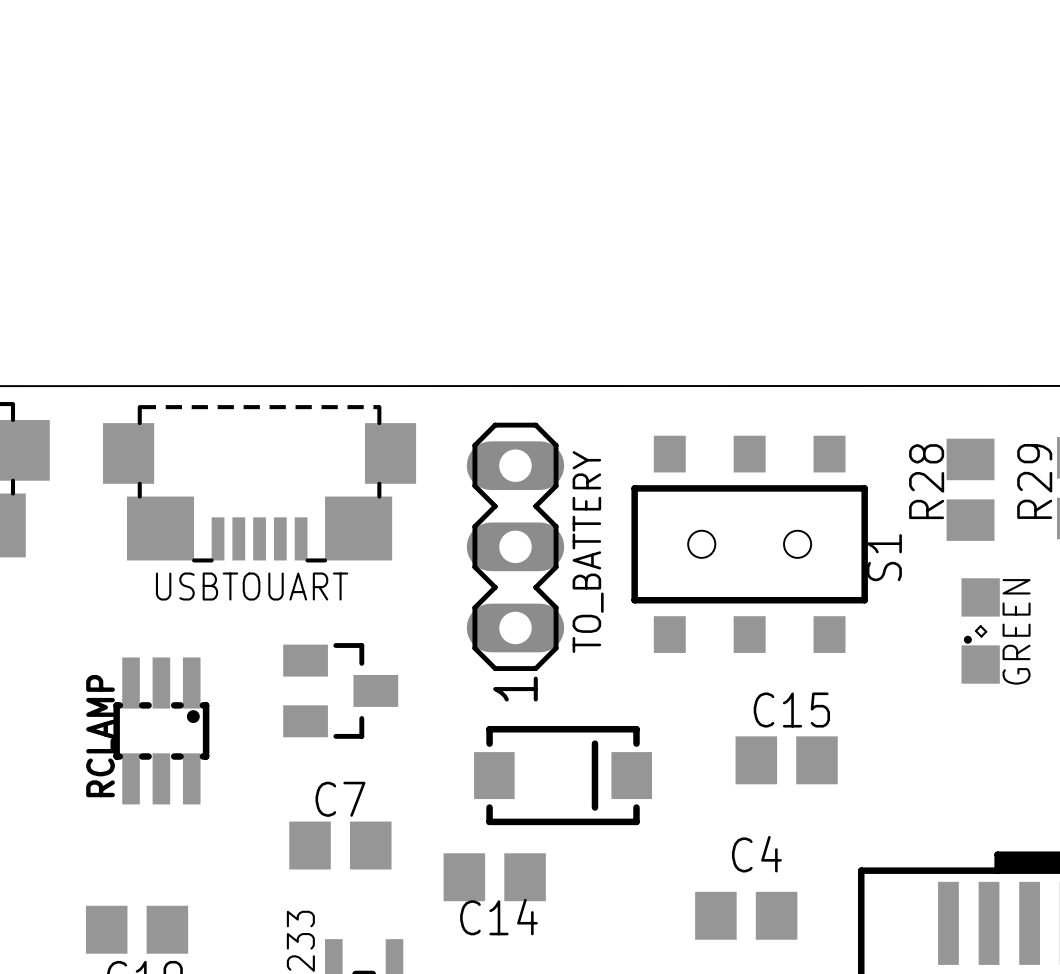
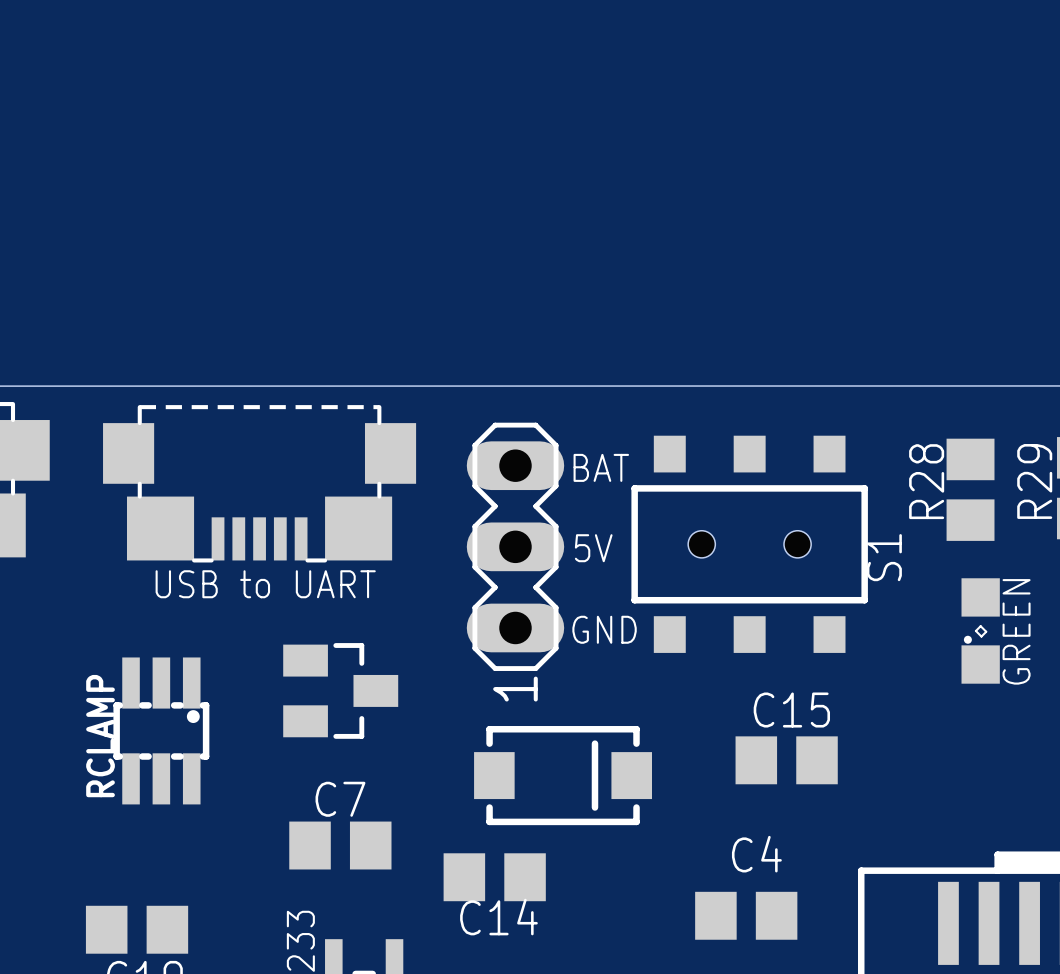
text: none -> BAT (601, 467)
text: none -> 5V (593, 548)
TO_BATTERY name: TO_BATTERY (588, 552) -> none
text: none -> USB to UART (265, 584)
USBTOUART name: USBTOUART (252, 586) -> none
text: none -> GND (604, 629)

